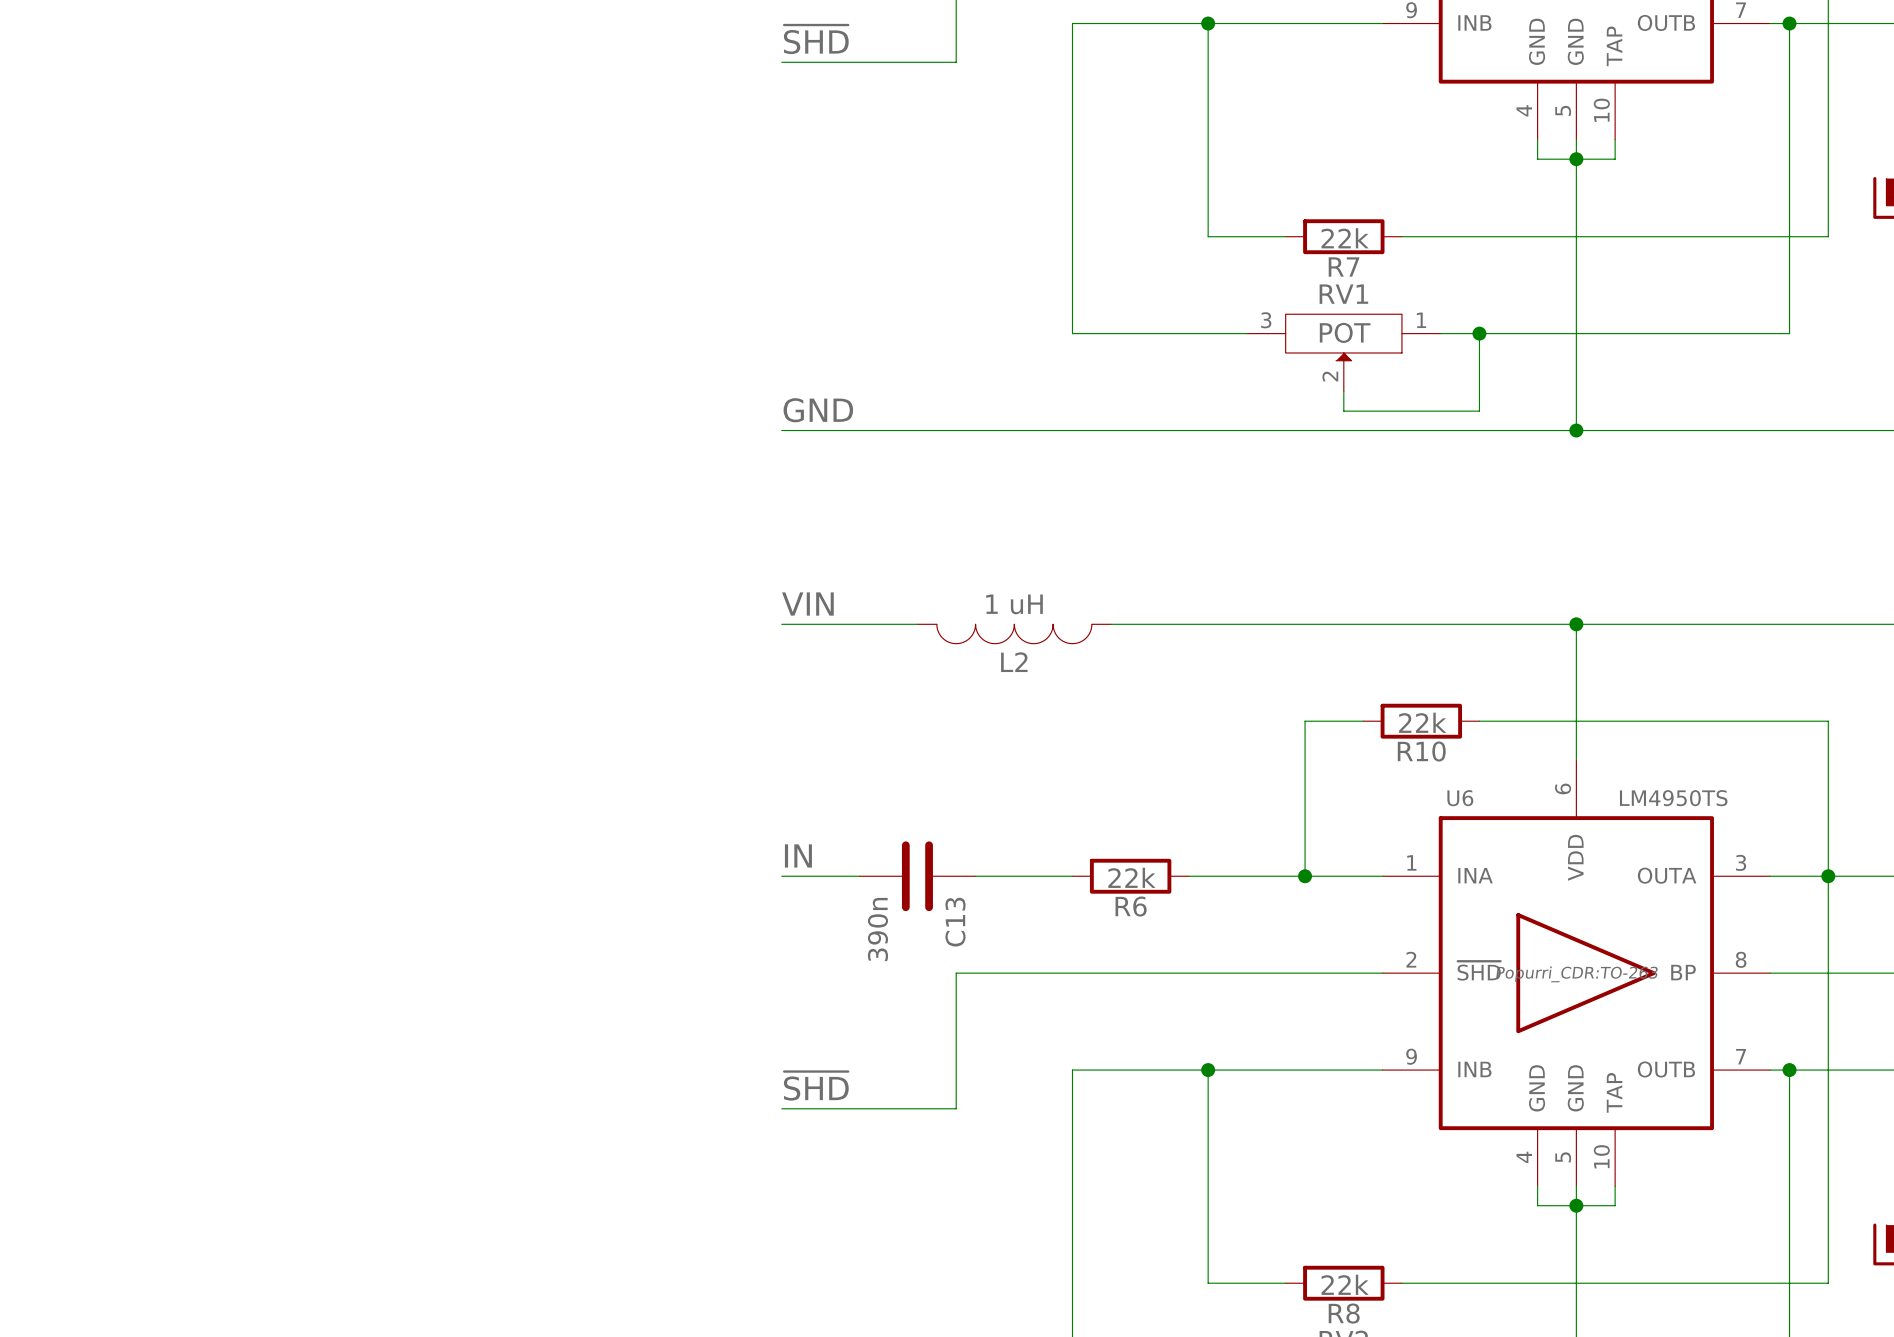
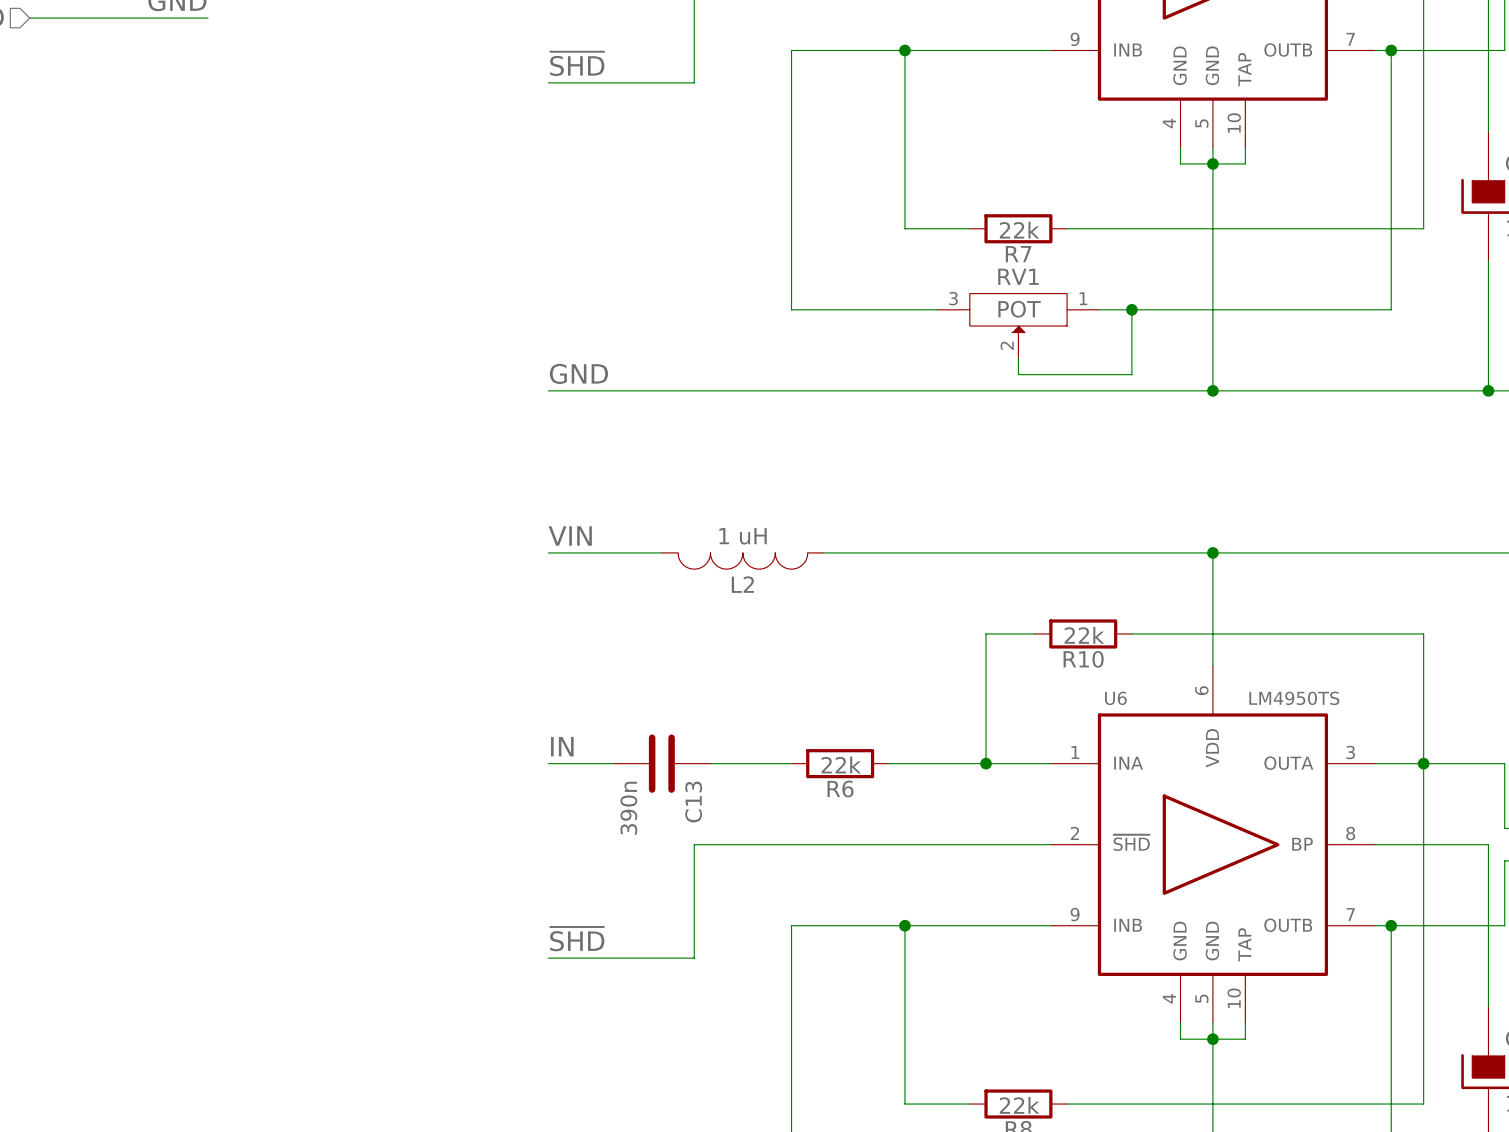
U6 text: Popurri_CDR:TO-263 (1577, 974) -> none

